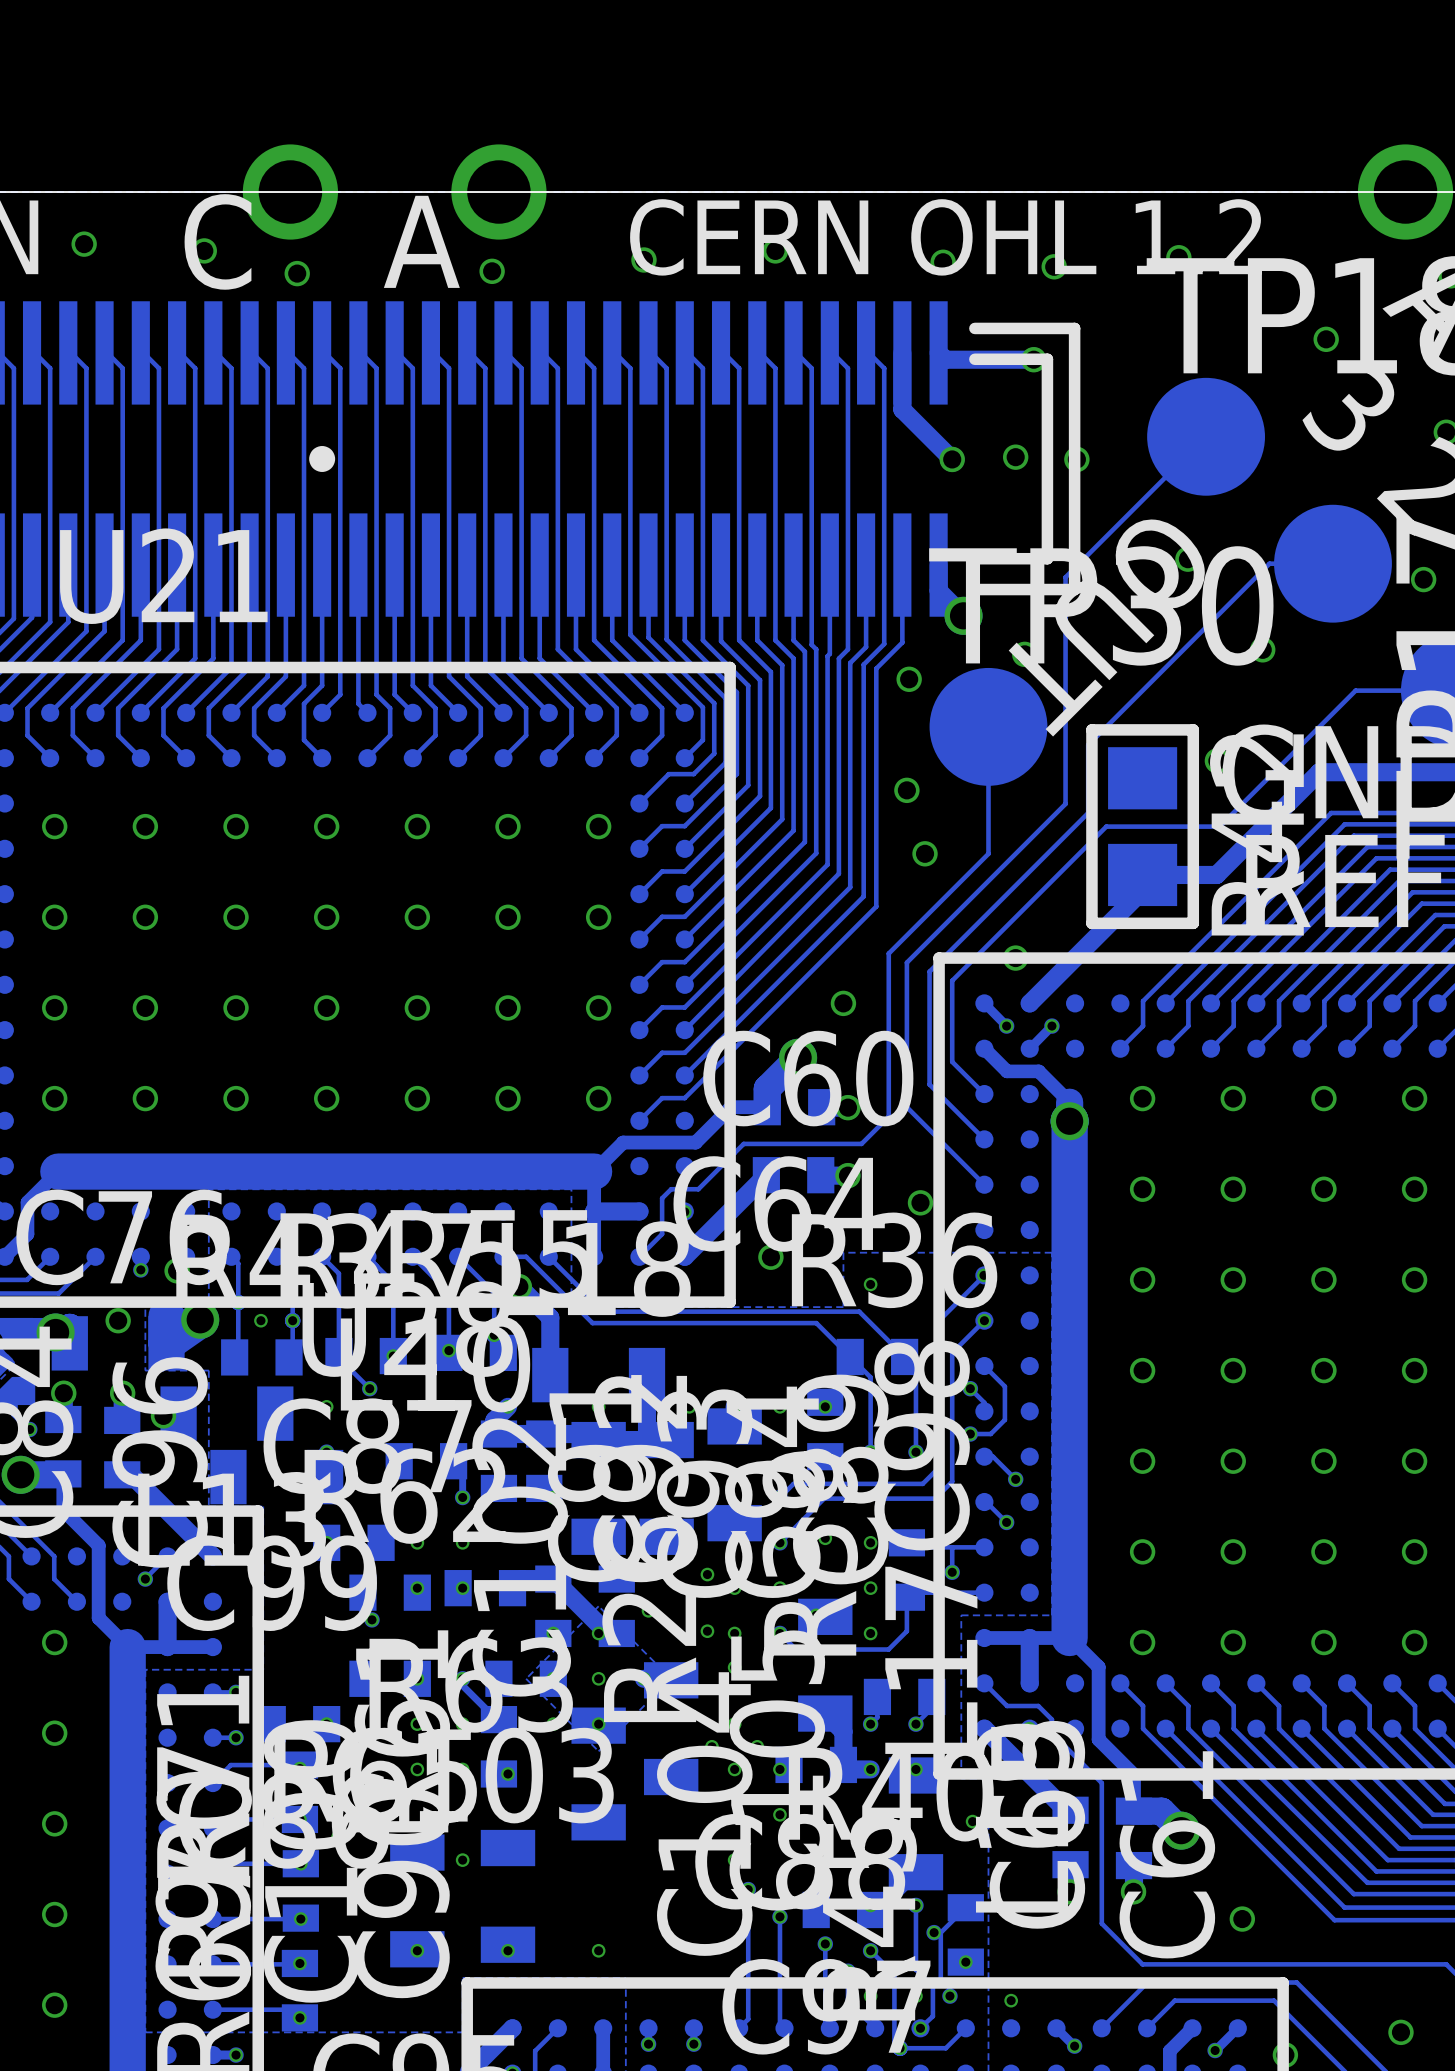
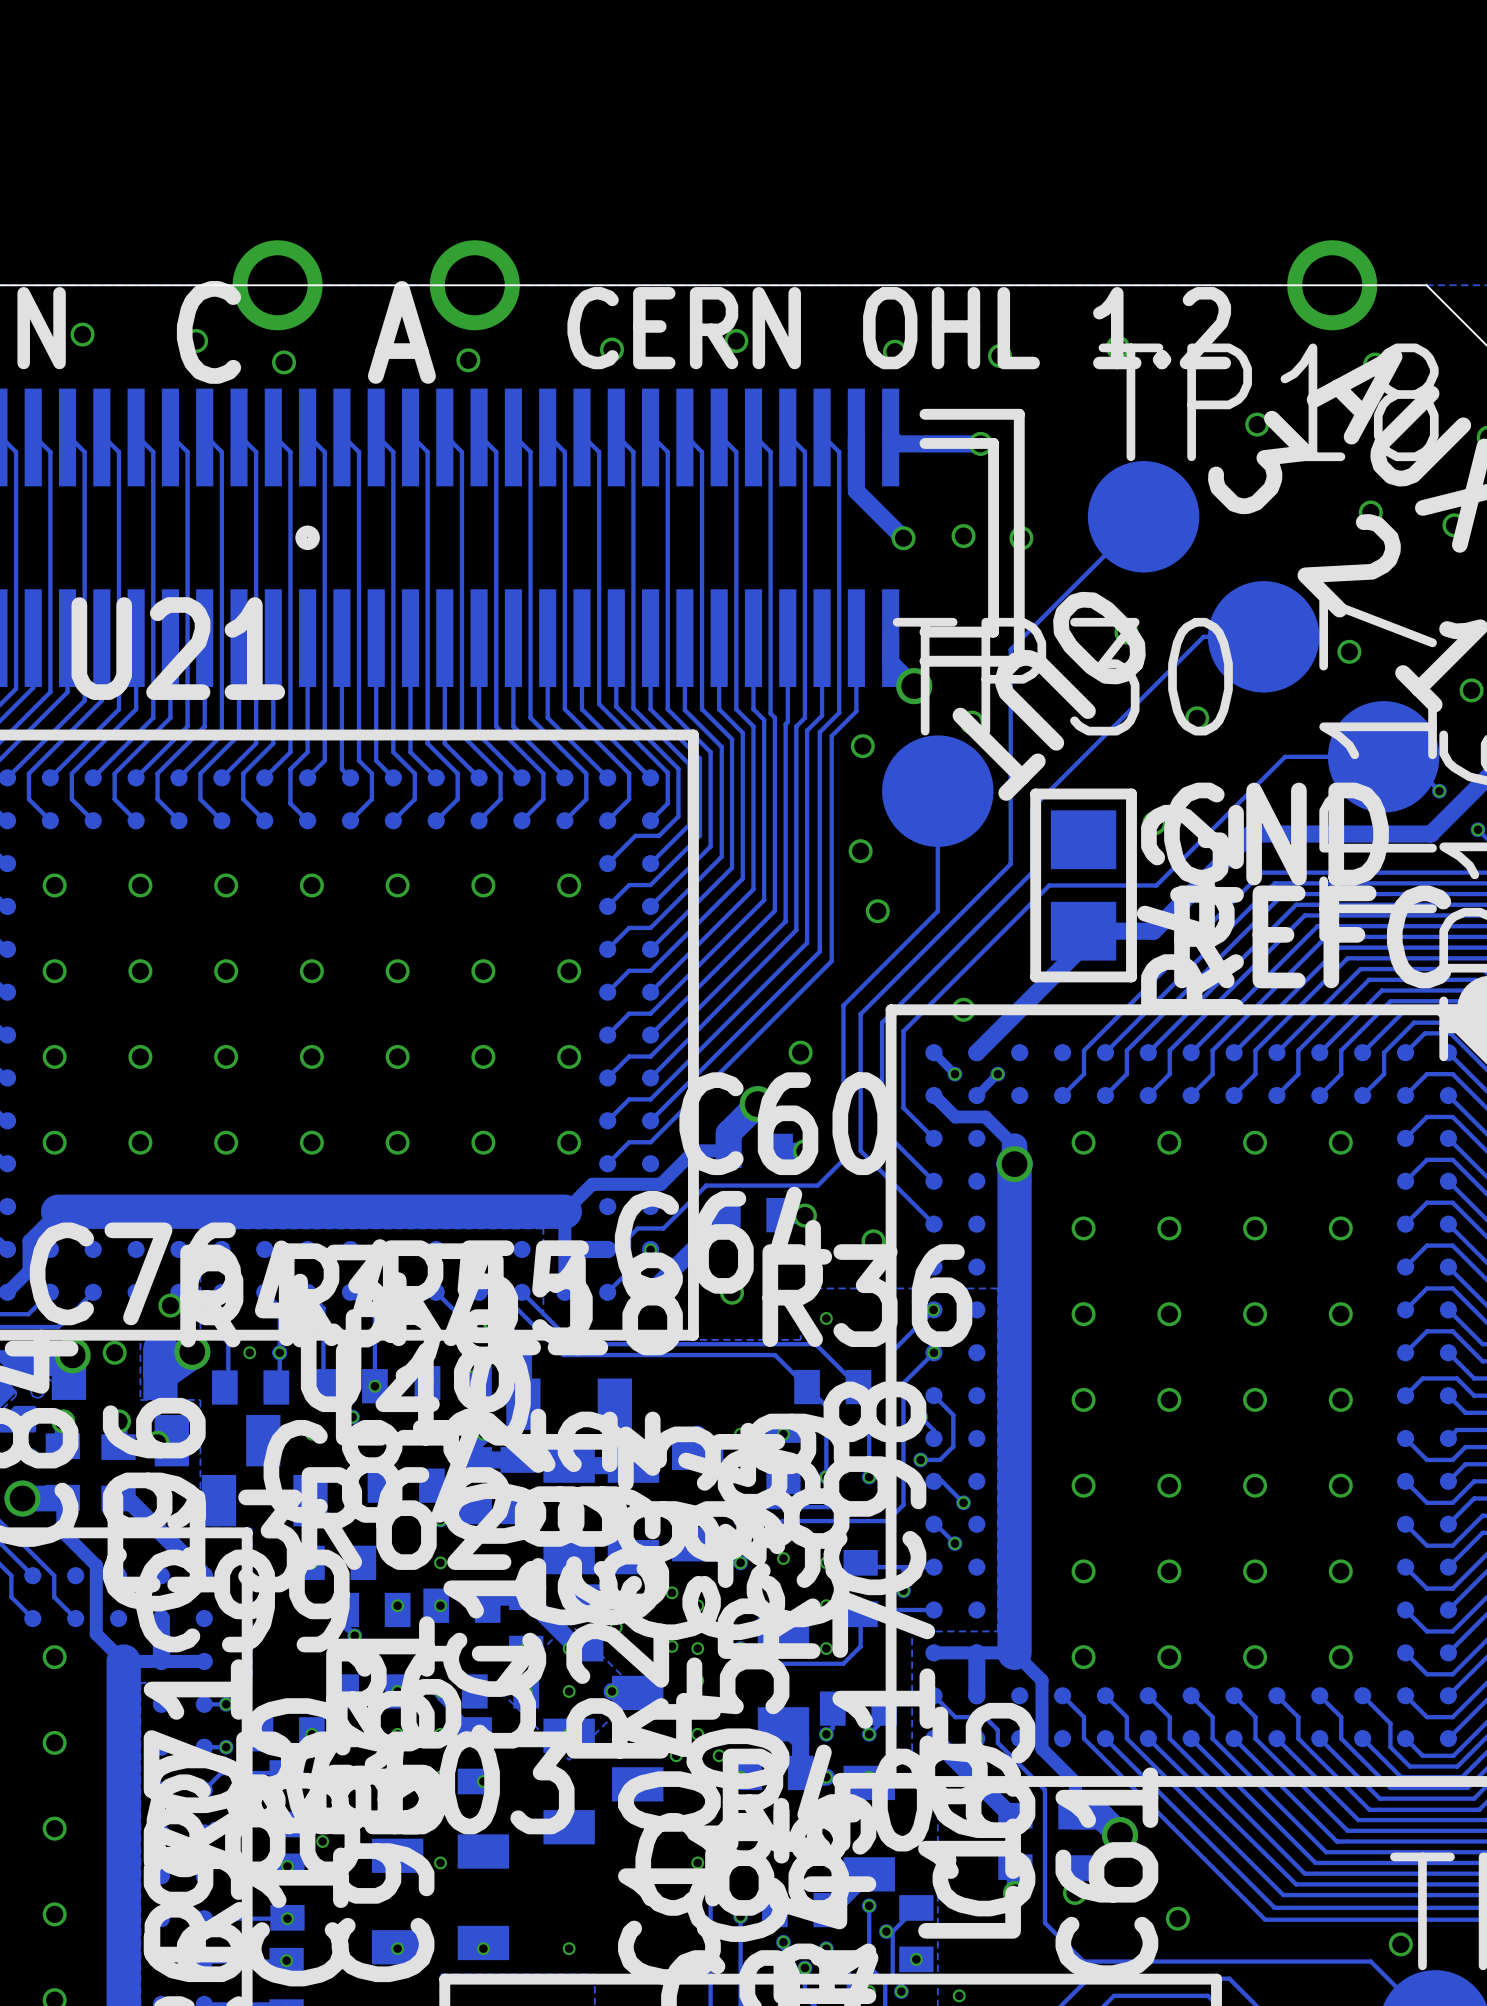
via position: (55, 1332) -> (72, 1355)

